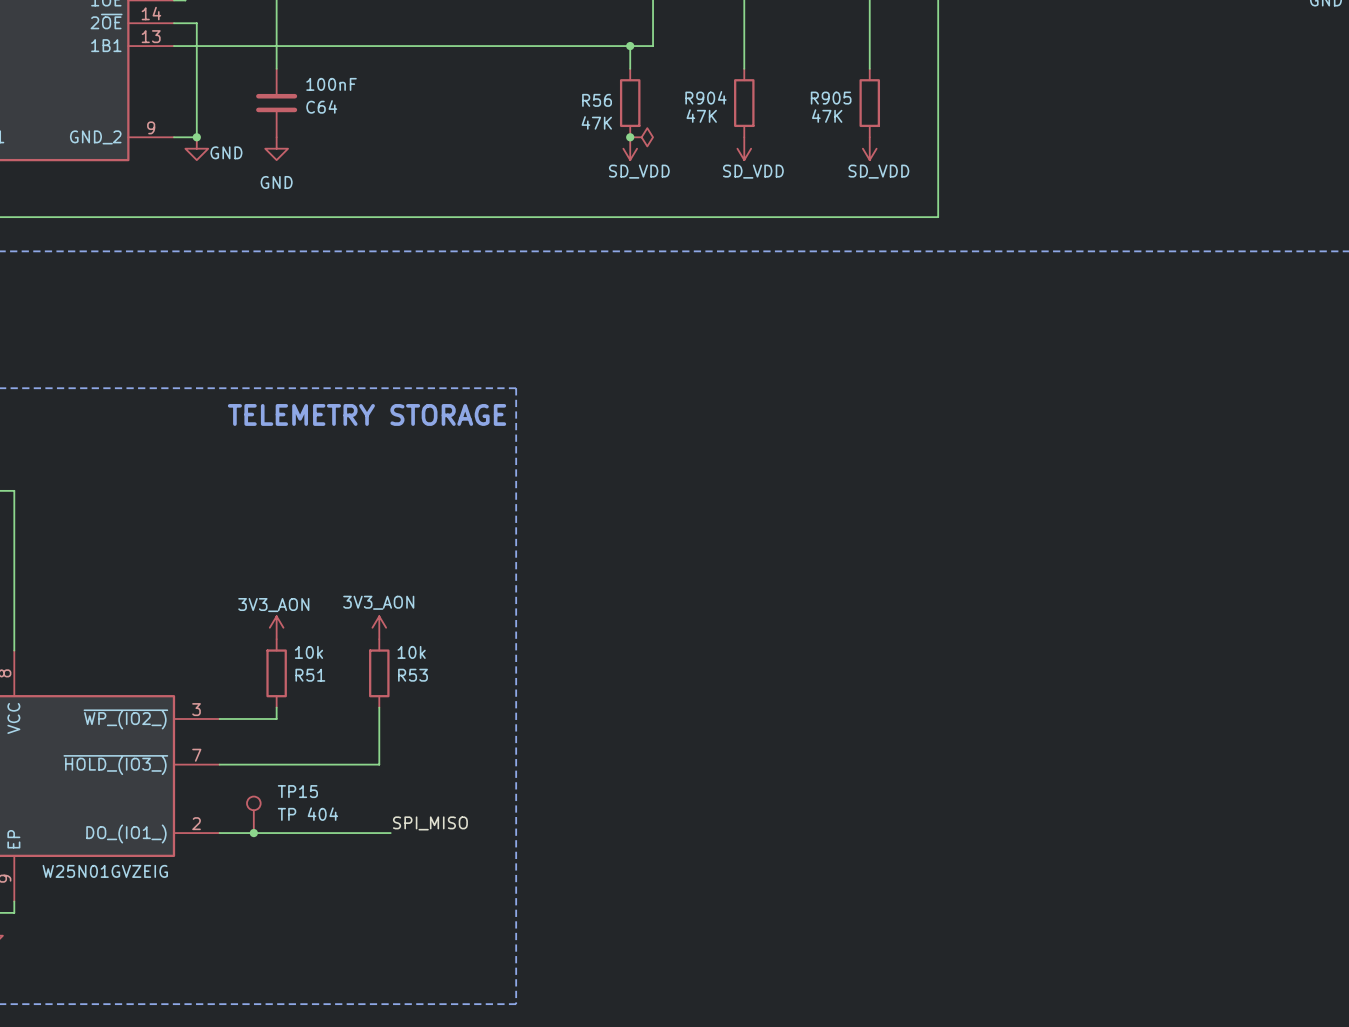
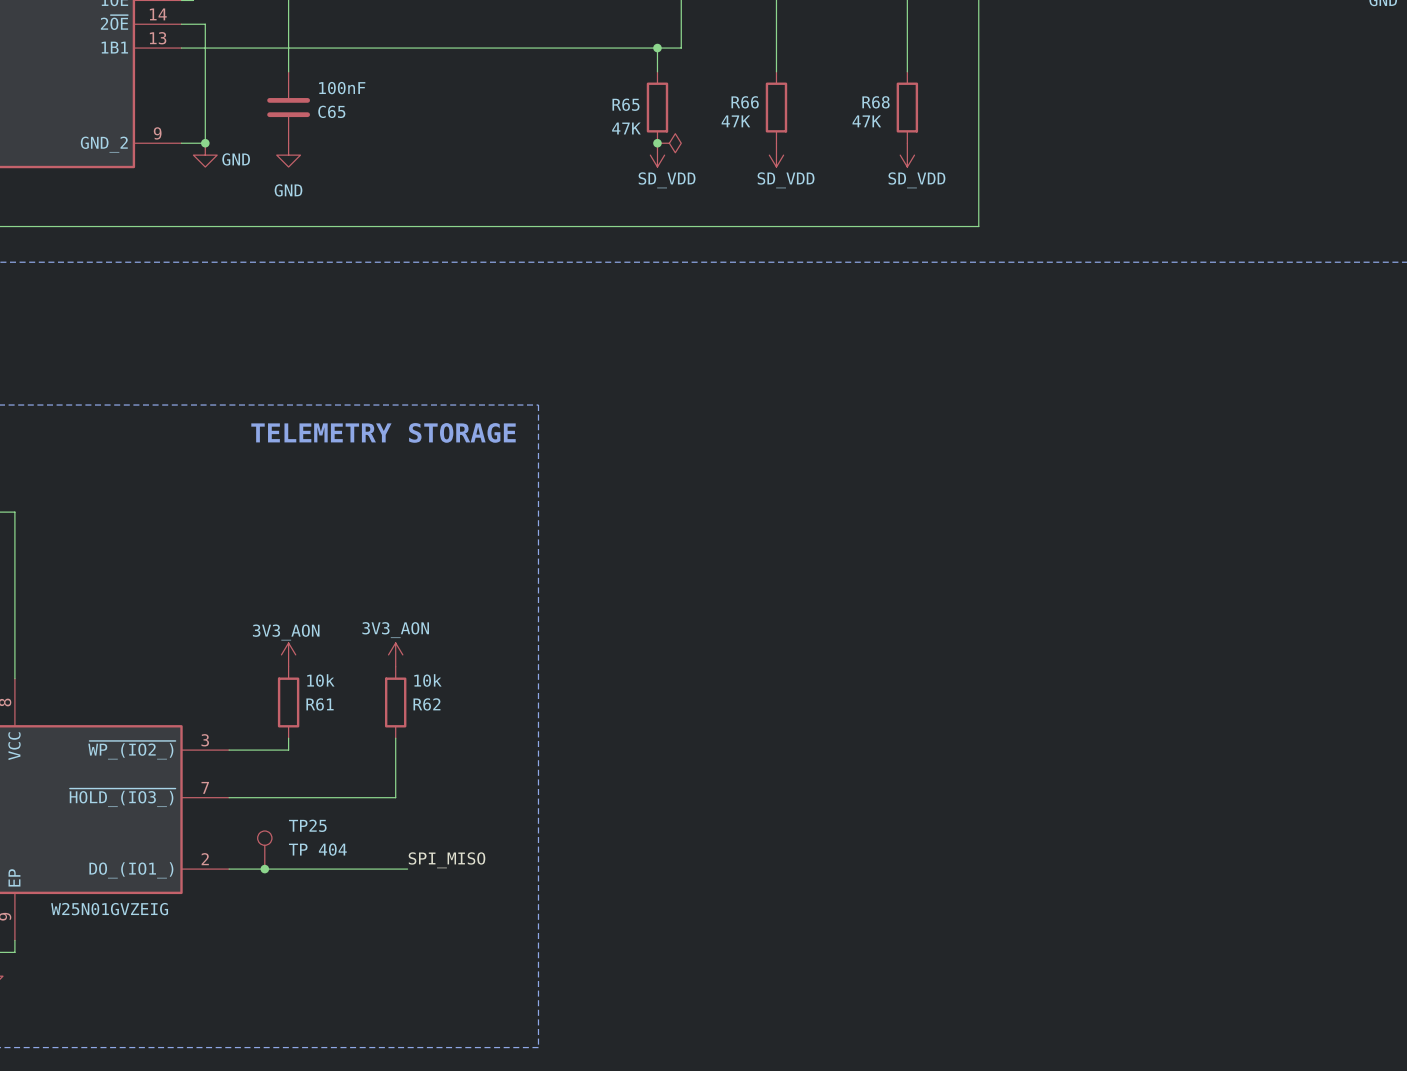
R904 name: R904 (705, 97) -> R66 (745, 102)
R905 name: R905 (831, 98) -> R68 (876, 102)
R56 name: R56 (597, 100) -> R65 (625, 104)
C64 name: C64 (321, 106) -> C65 (331, 111)
R51 name: R51 (310, 675) -> R61 (320, 704)
R53 name: R53 (413, 675) -> R62 (426, 704)
TP15 name: TP15 (297, 791) -> TP25 (307, 825)

